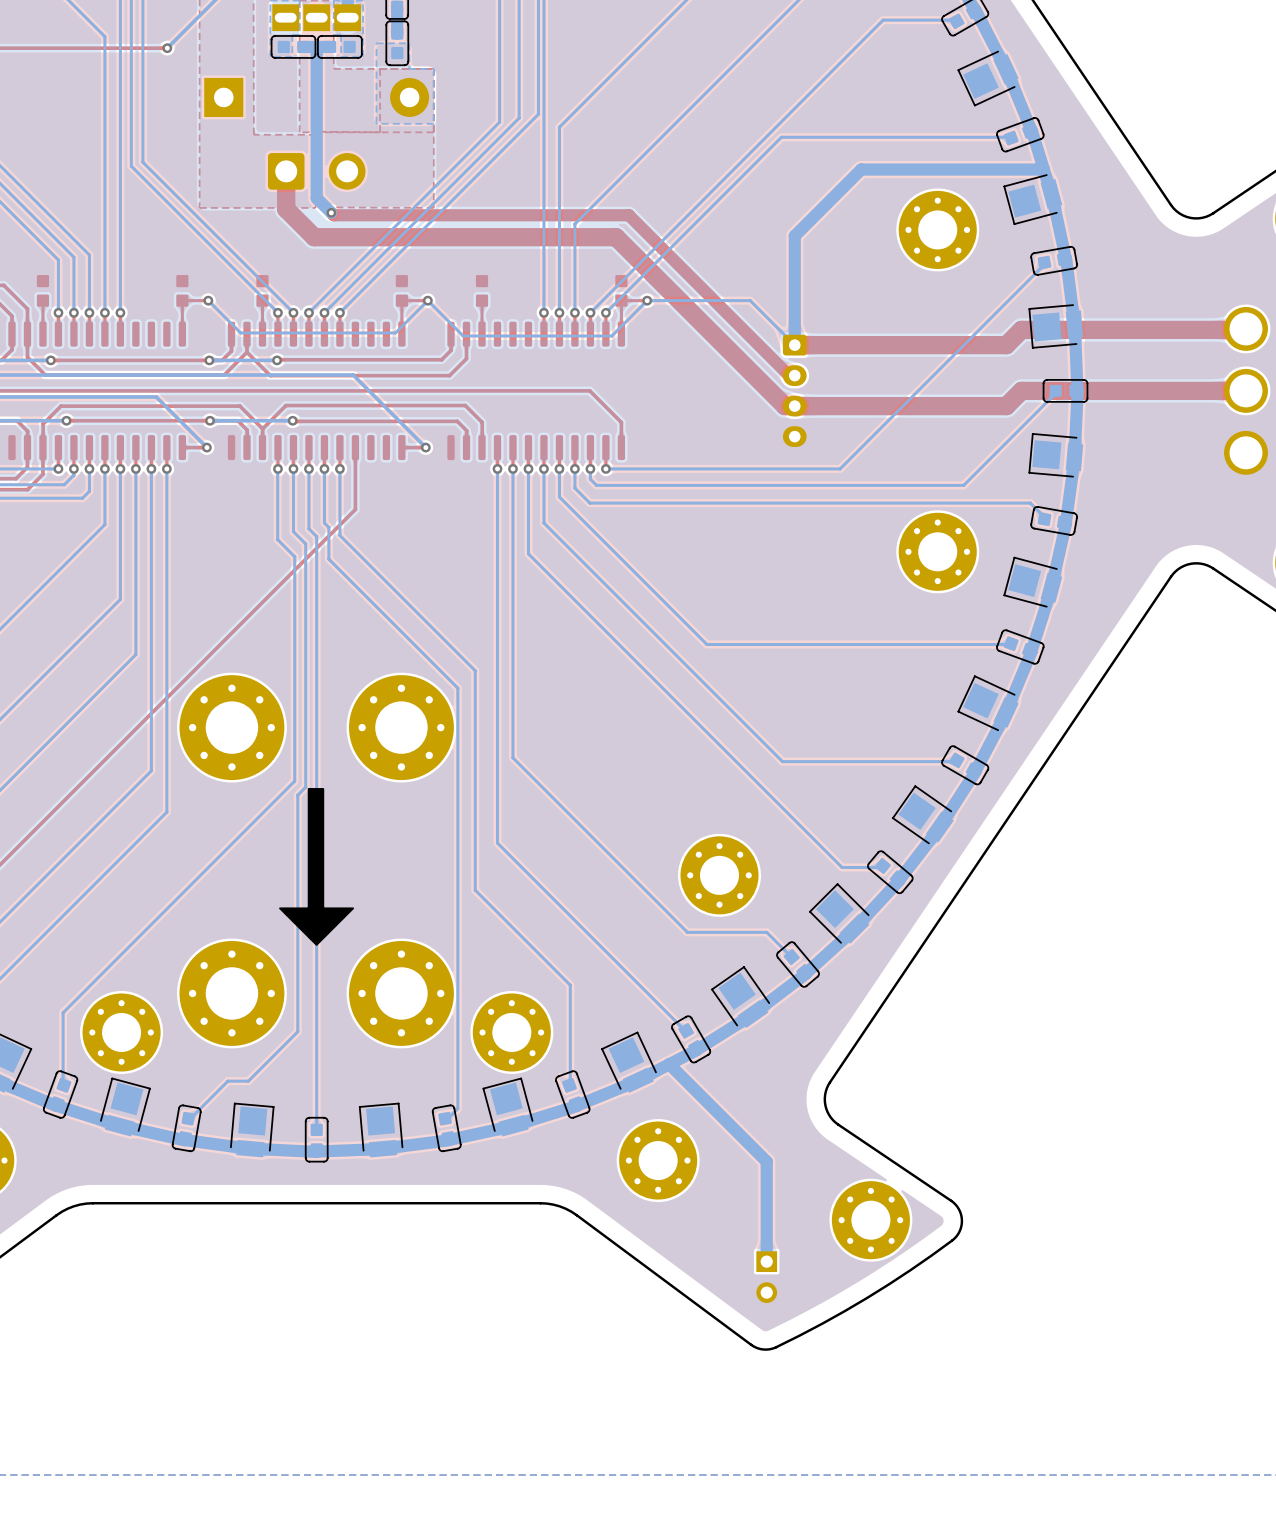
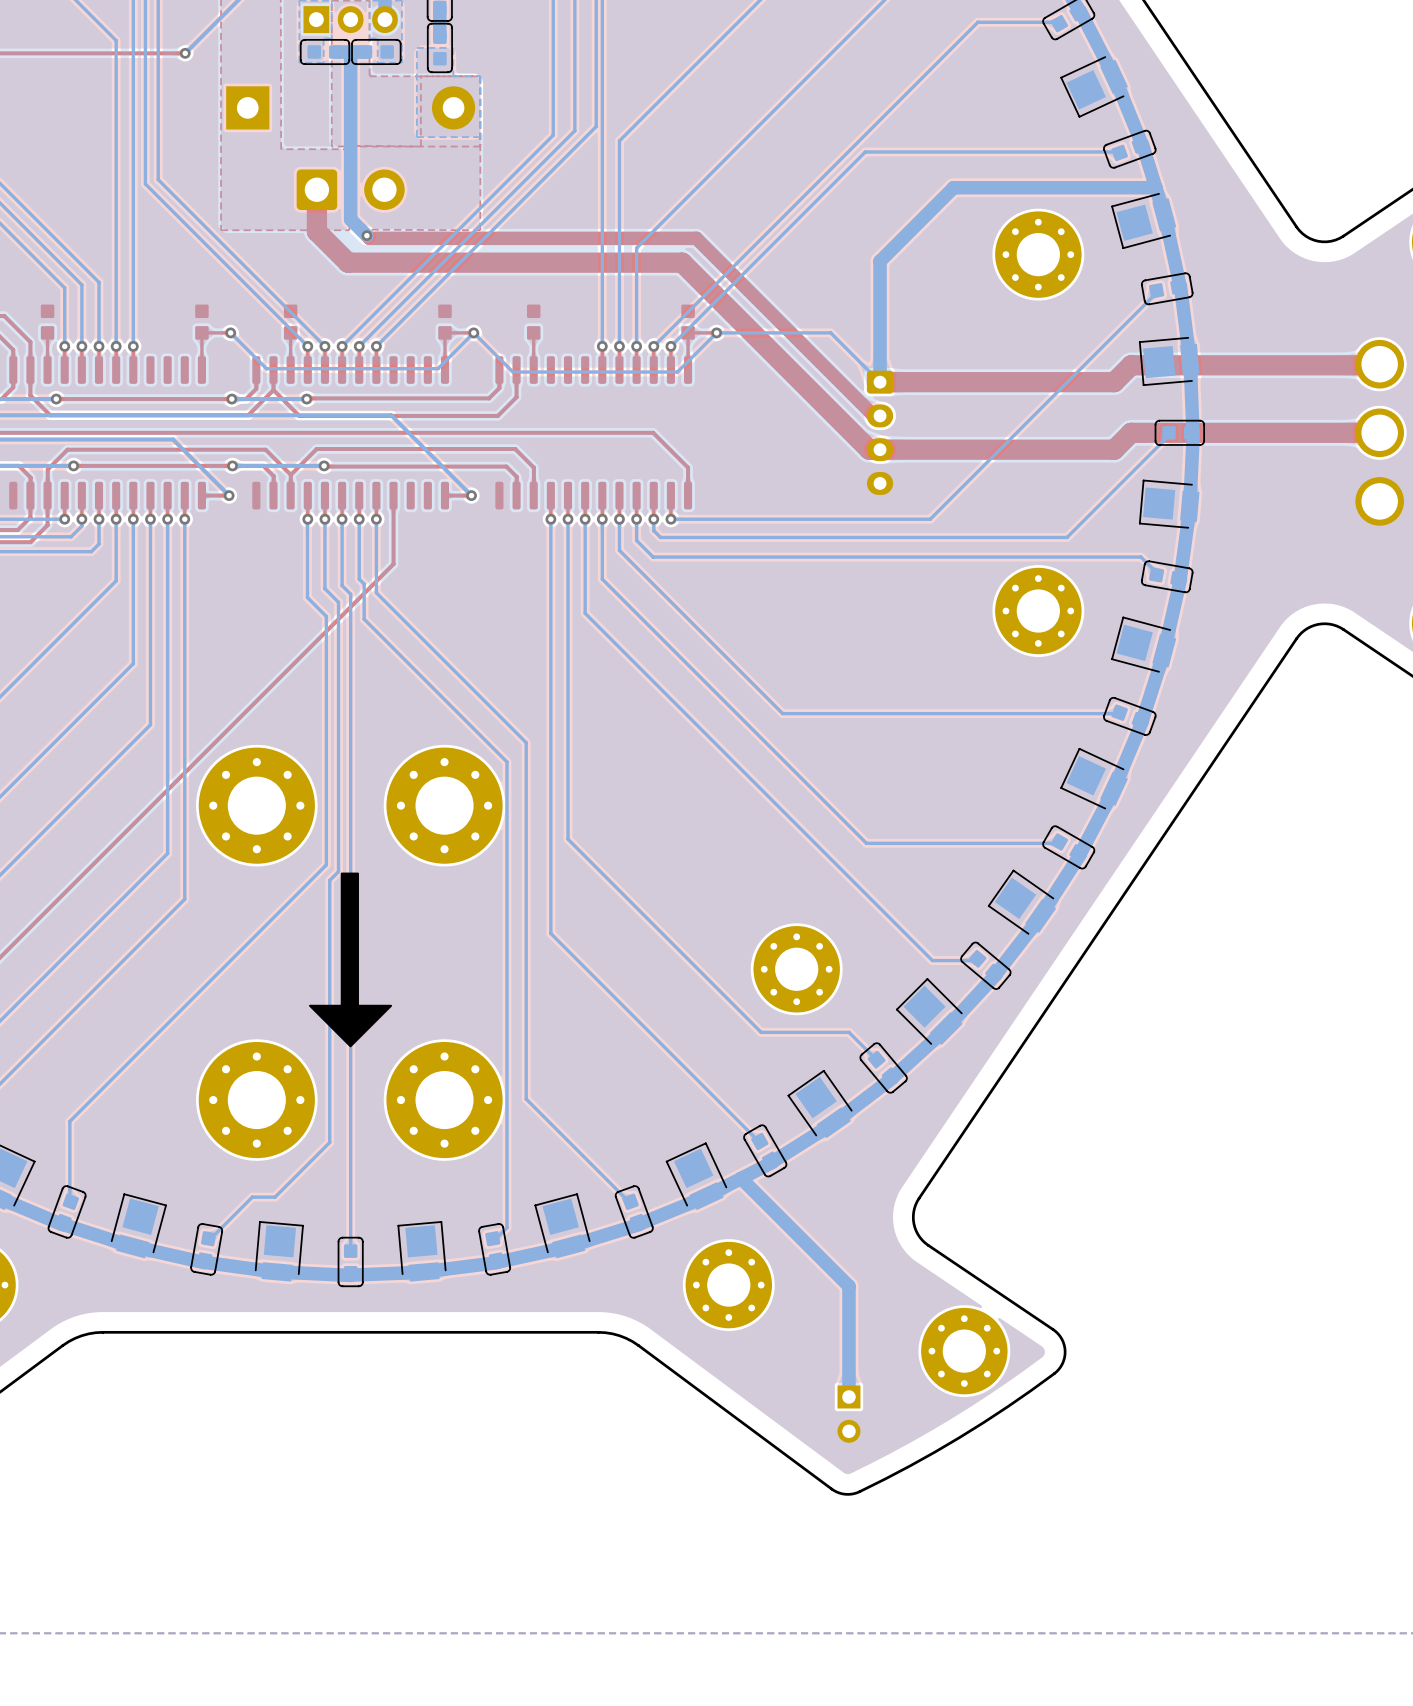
part footprint: [272, 4, 362, 32] -> [303, 6, 398, 34]
bottom track: (475, 890) (570, 985) (570, 1087) -> (526, 985) (526, 1099) (631, 1204)
part: (121, 1032) -> none
part: (511, 1032) -> none

